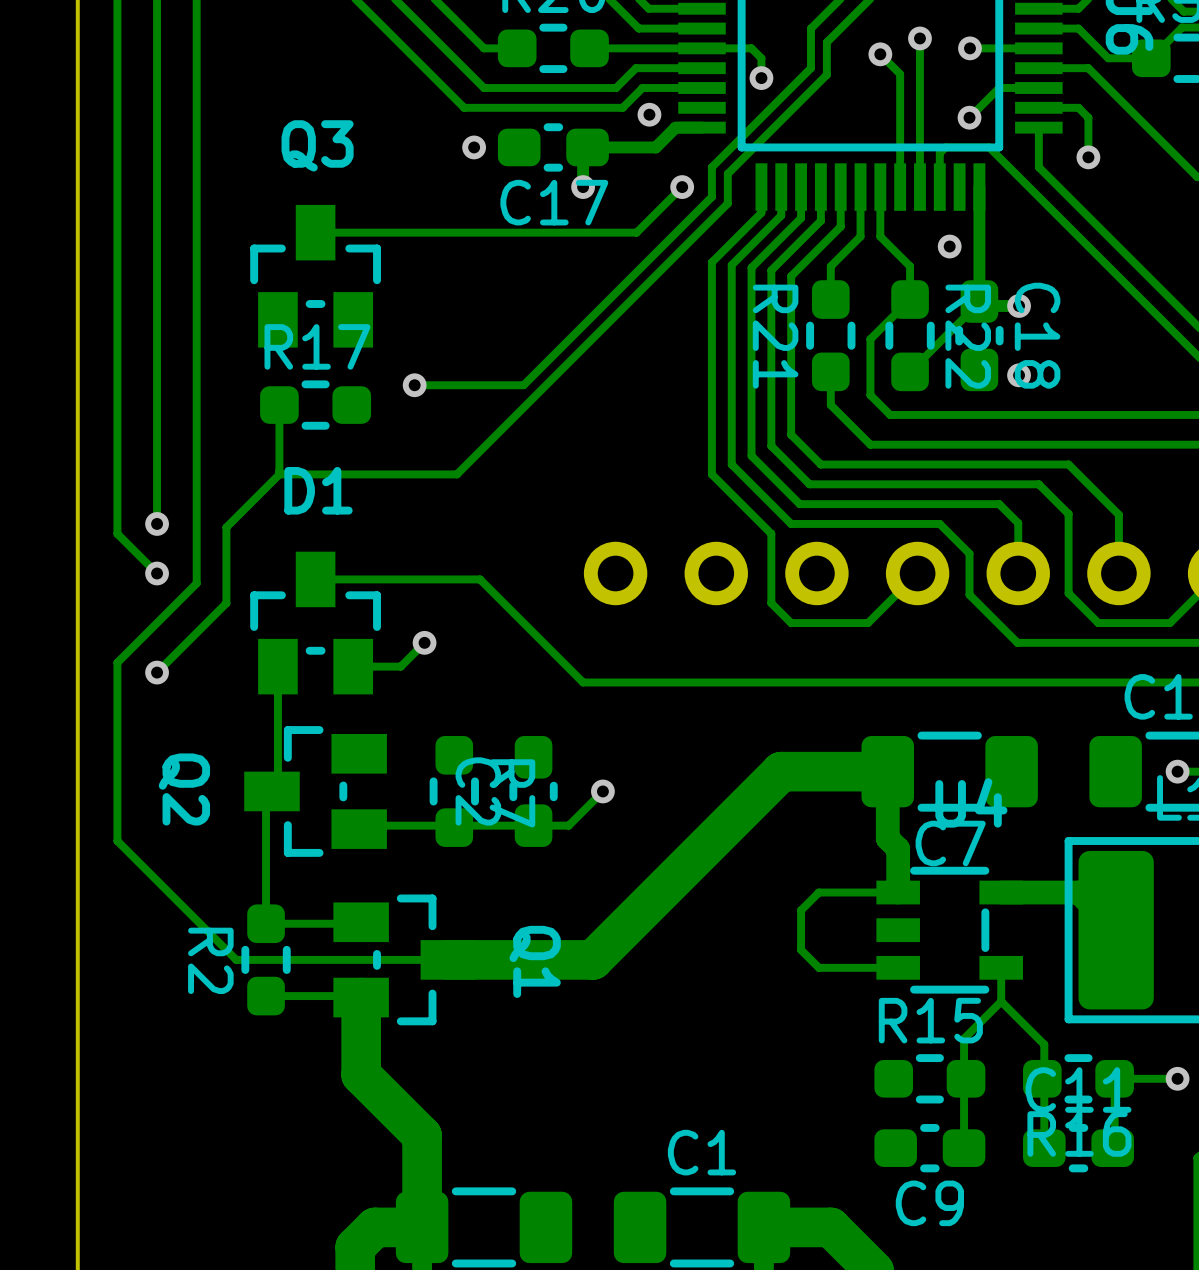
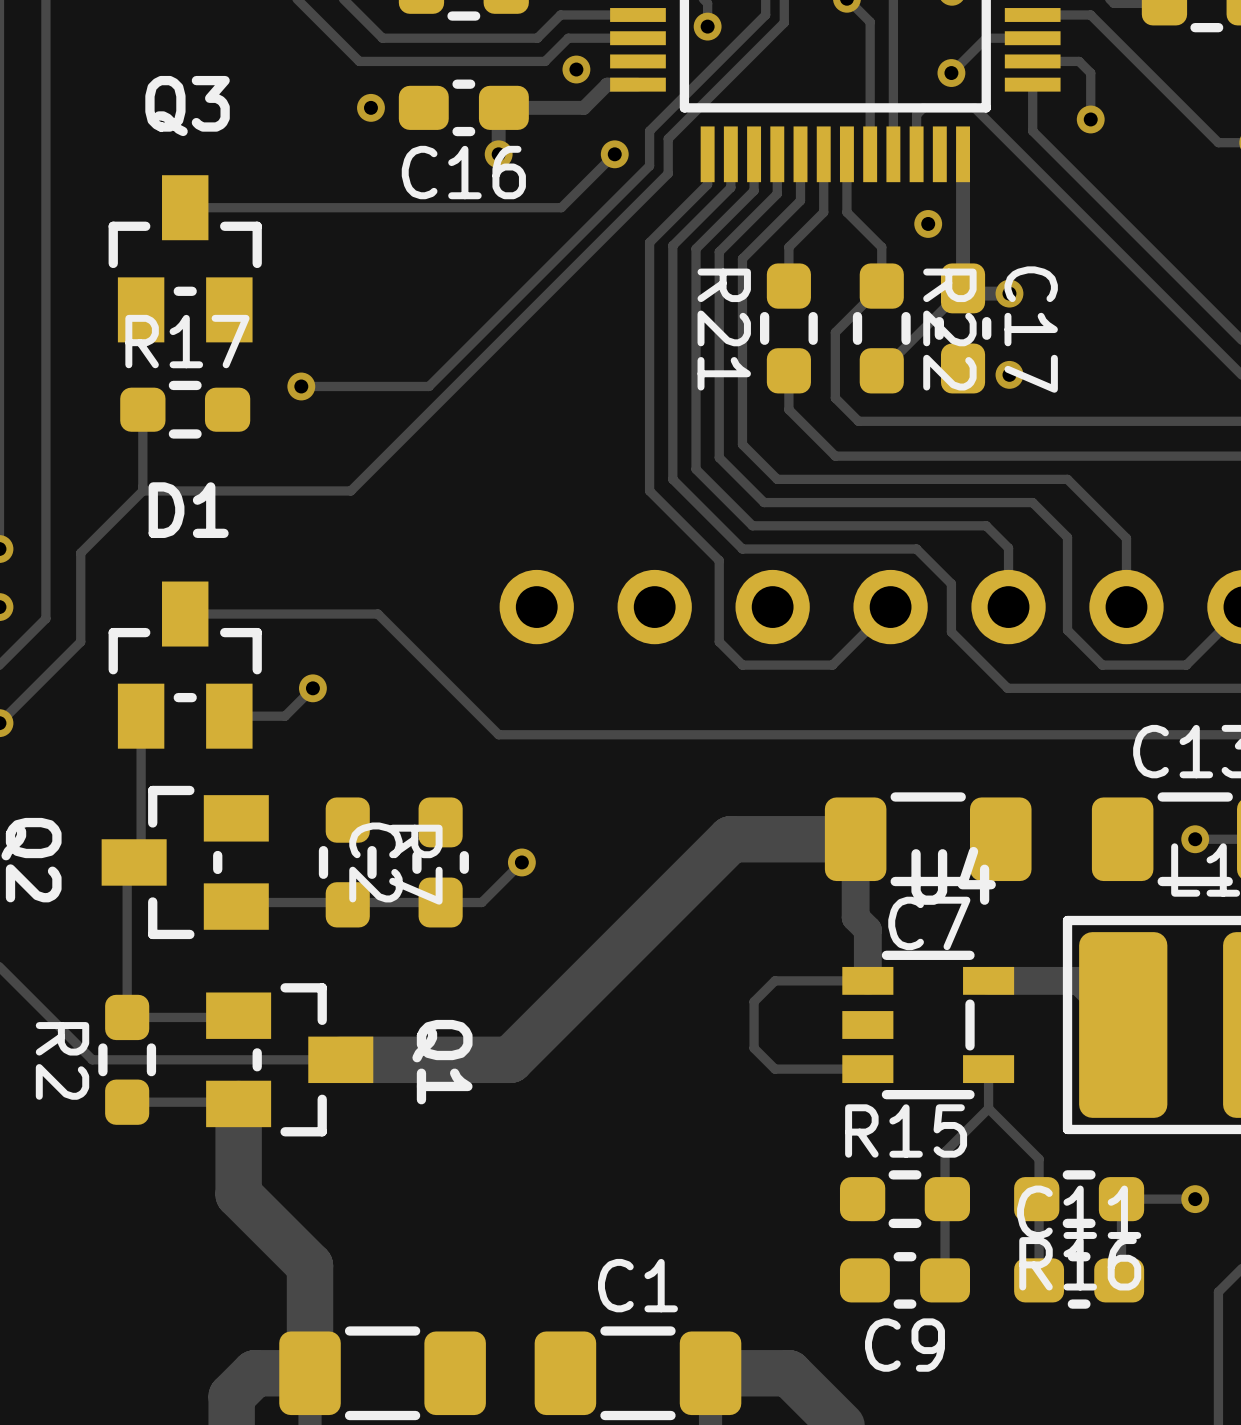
C17 name: C17 (554, 202) -> C16 (463, 172)
C18 name: C18 (1037, 335) -> C17 (1031, 329)

